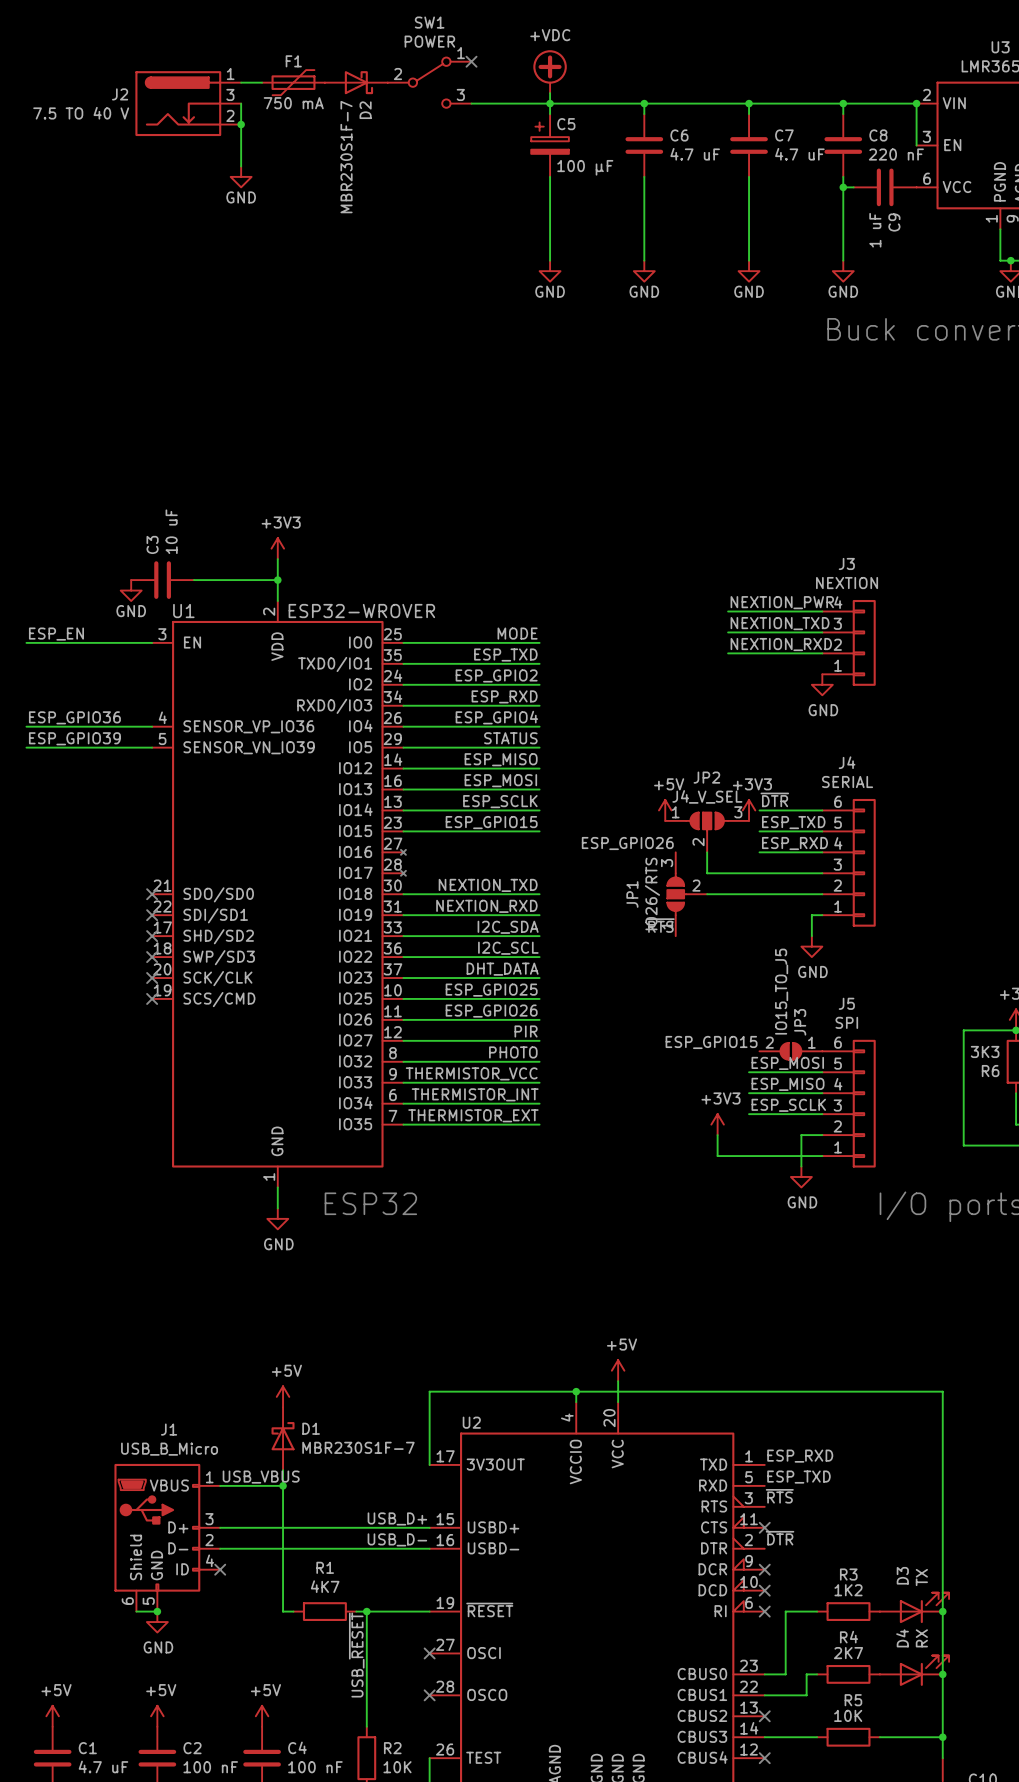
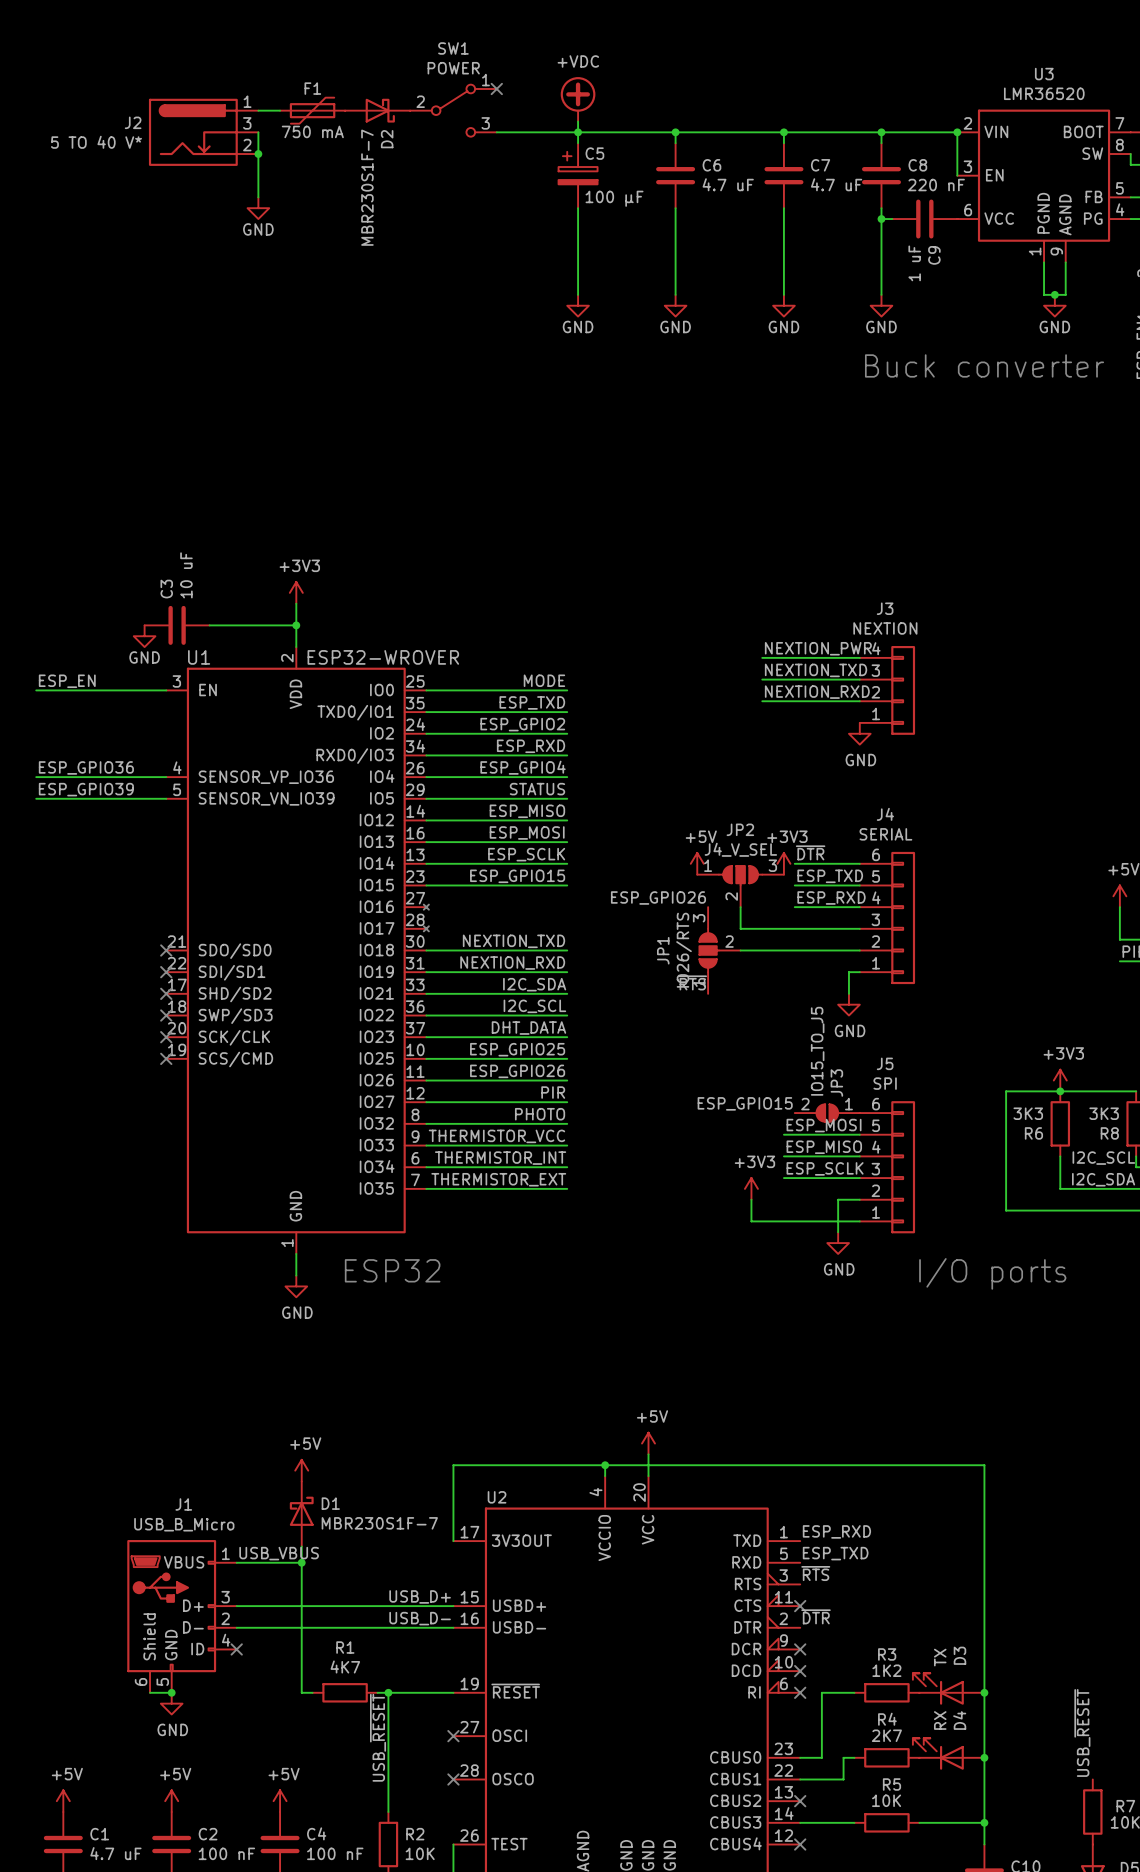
J2 value: 7.5 TO 40 V (81, 113) -> 5 TO 40 V* (96, 142)
D3 flip: as is (924, 1607) -> left-right (938, 1689)
D4 flip: as is (924, 1670) -> left-right (938, 1754)

